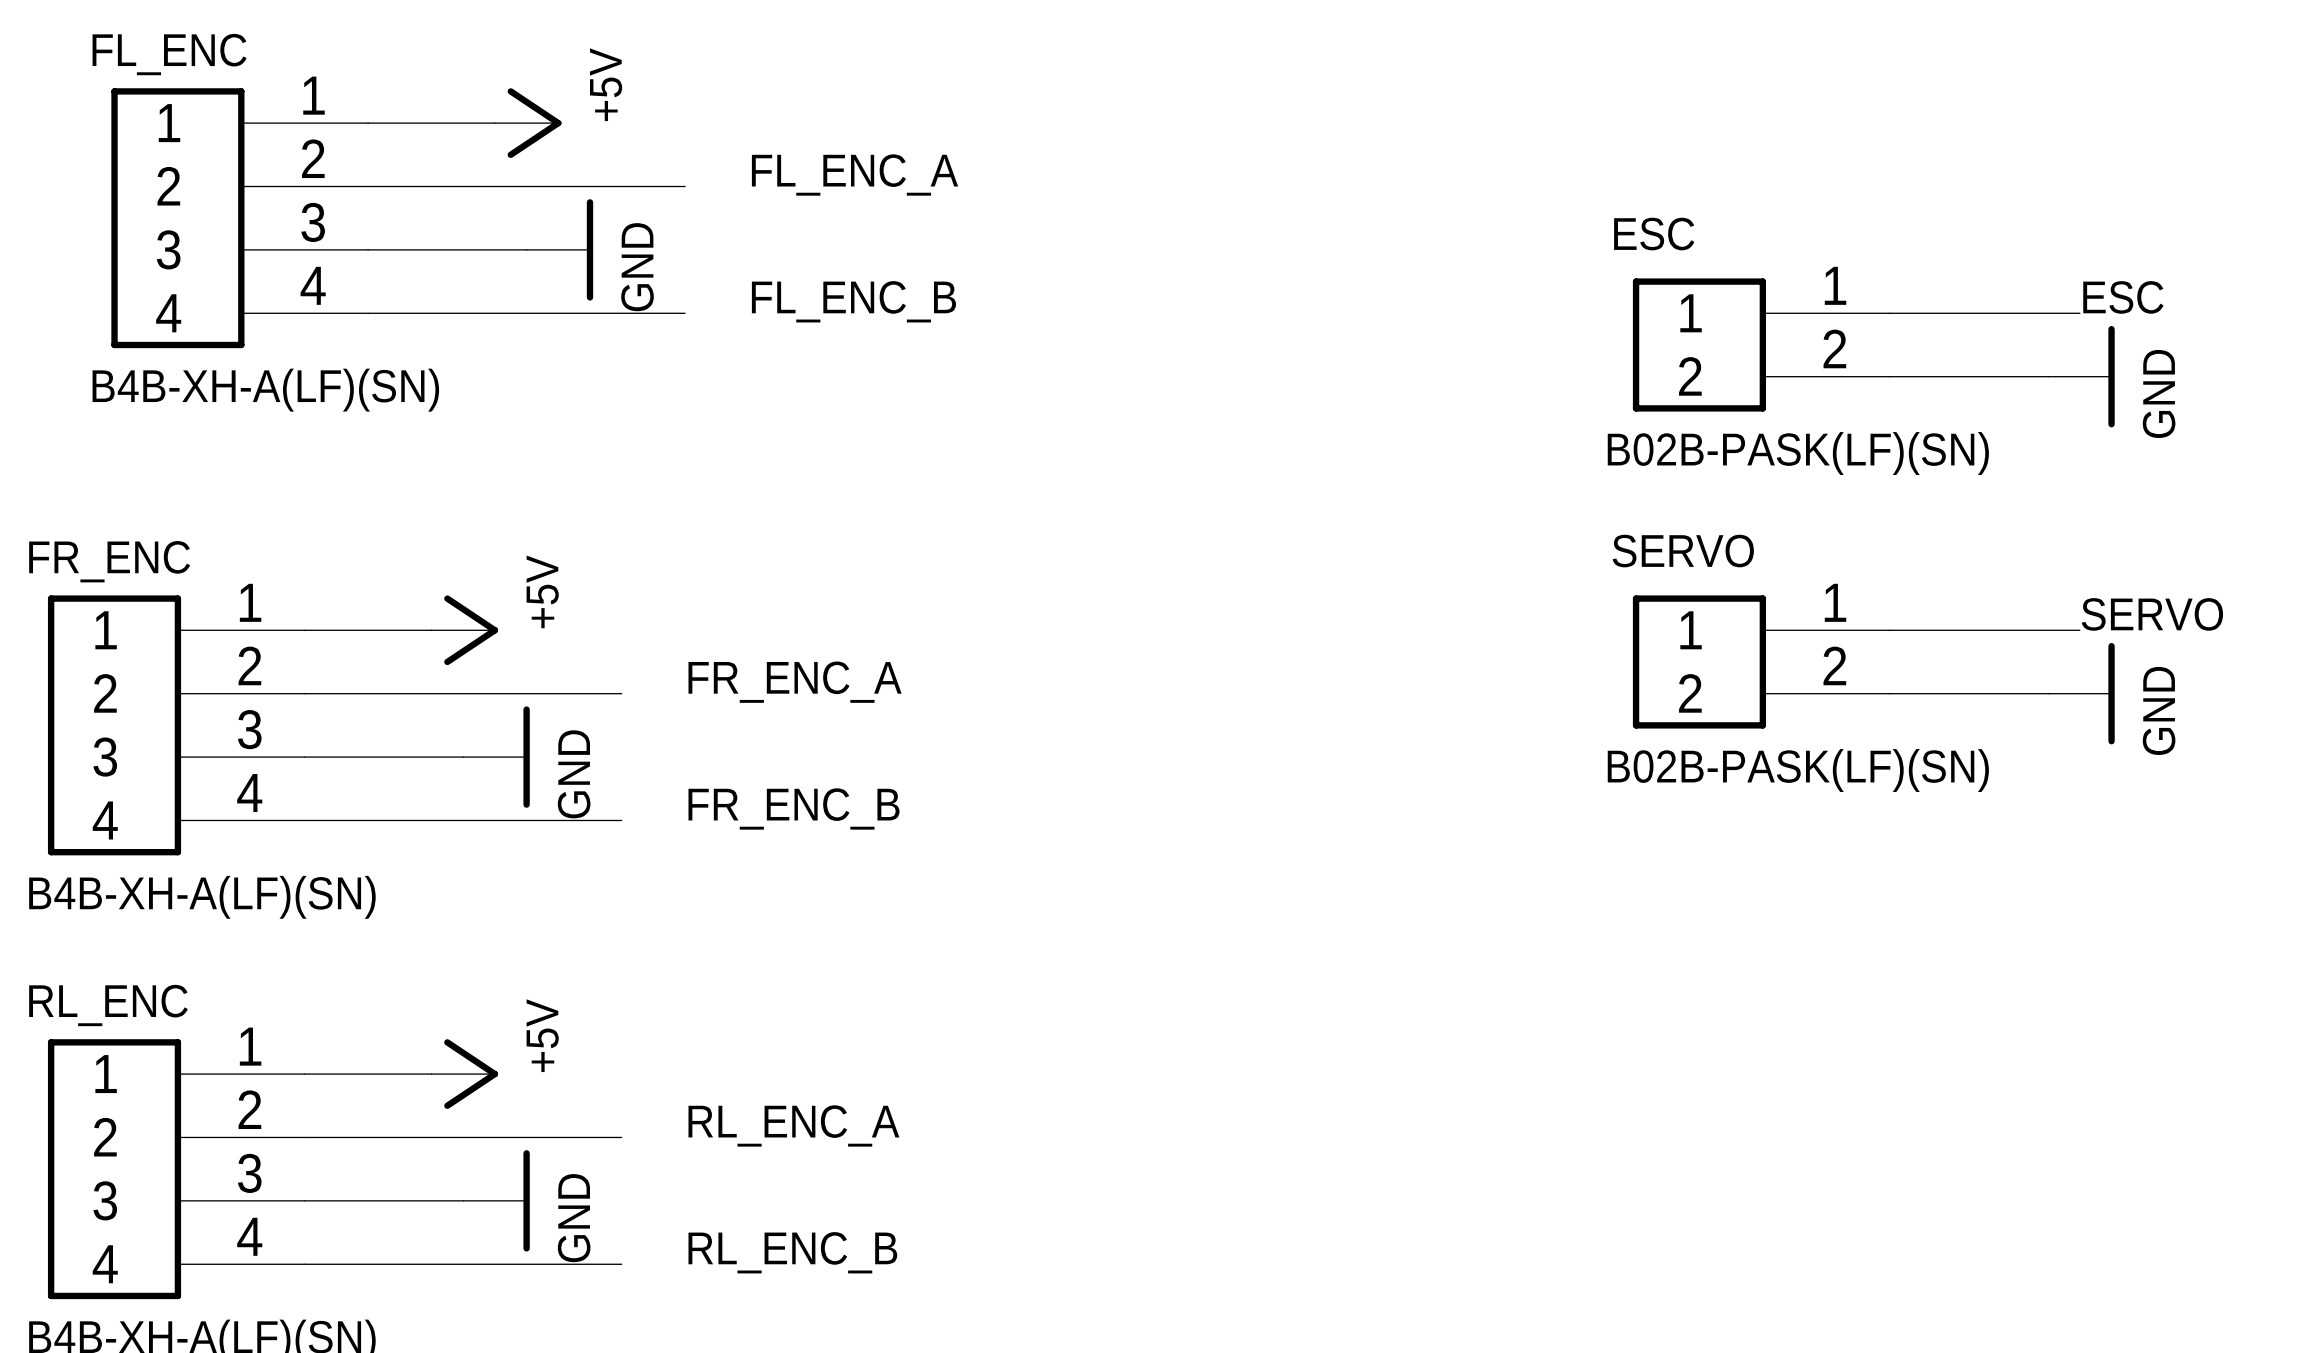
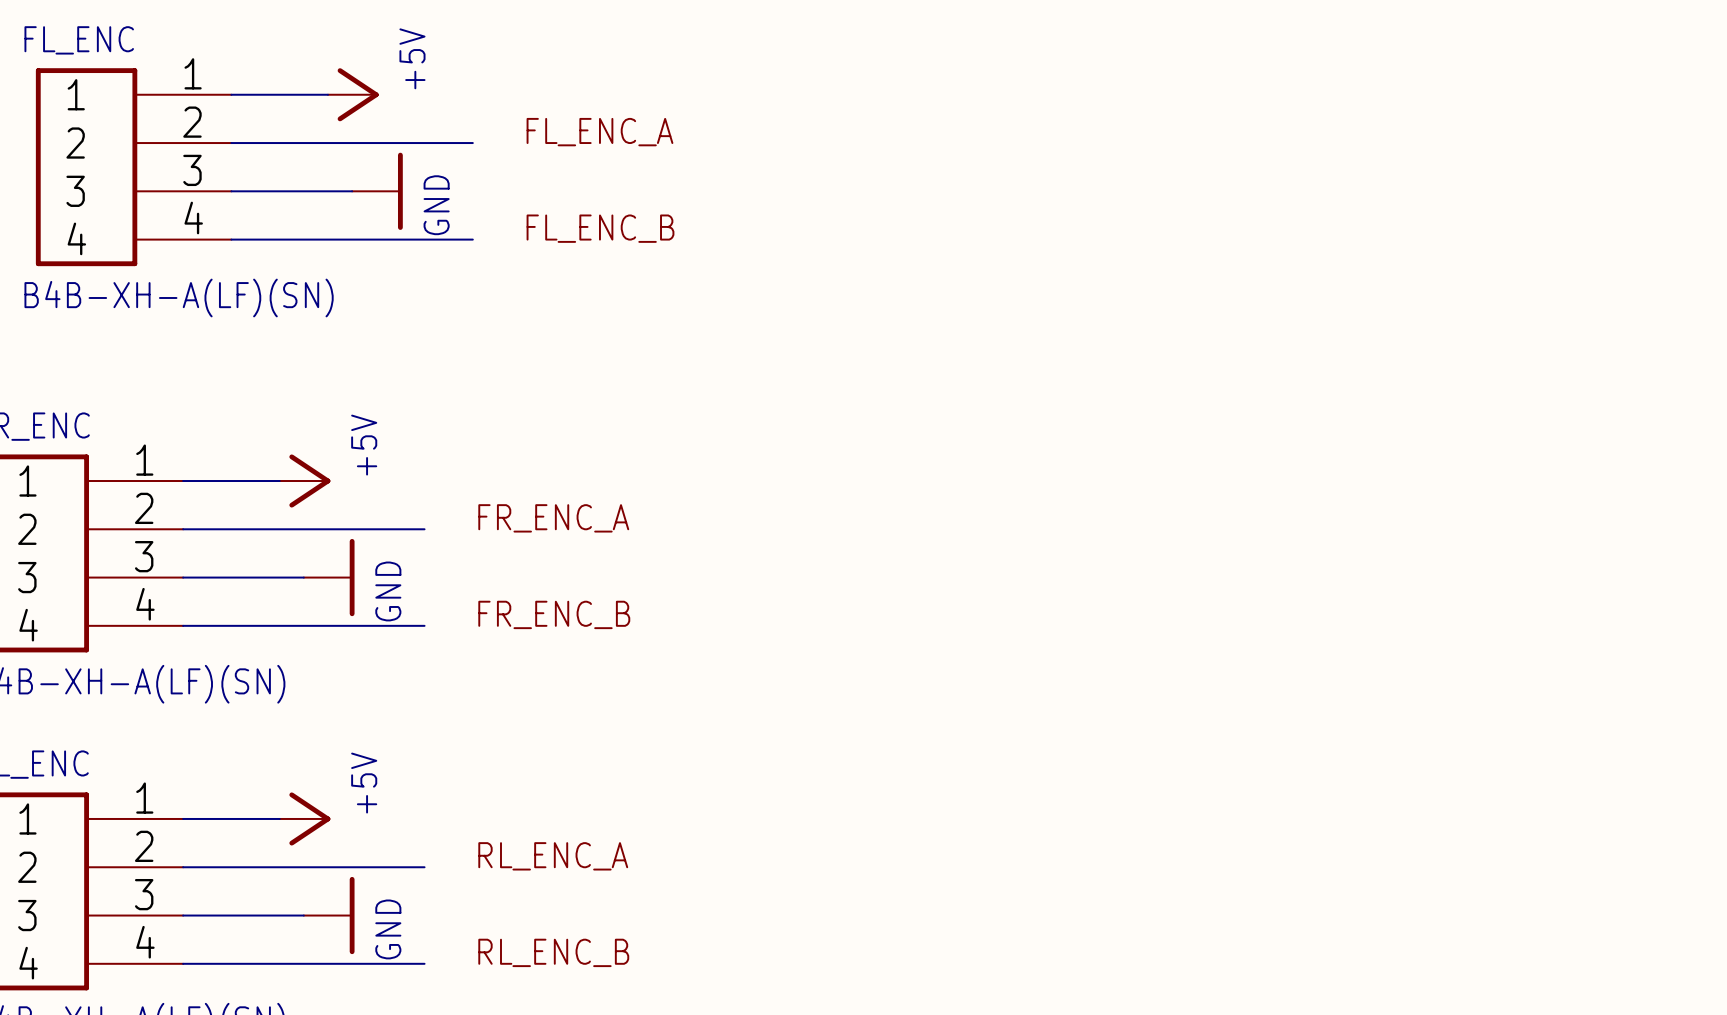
label: ESC (2123, 297) -> none
wire: (1889, 313) (2079, 313) -> none
ESC: B02B-PASK(LF)(SN) (1761, 344) -> none
wire: (1889, 376) (2048, 376) -> none
power symbol: GND (2081, 376) -> none
label: SERVO (2152, 614) -> none
wire: (1889, 630) (2079, 630) -> none
SERVO: B02B-PASK(LF)(SN) (1761, 661) -> none
wire: (1889, 693) (2048, 693) -> none
power symbol: GND (2081, 693) -> none

